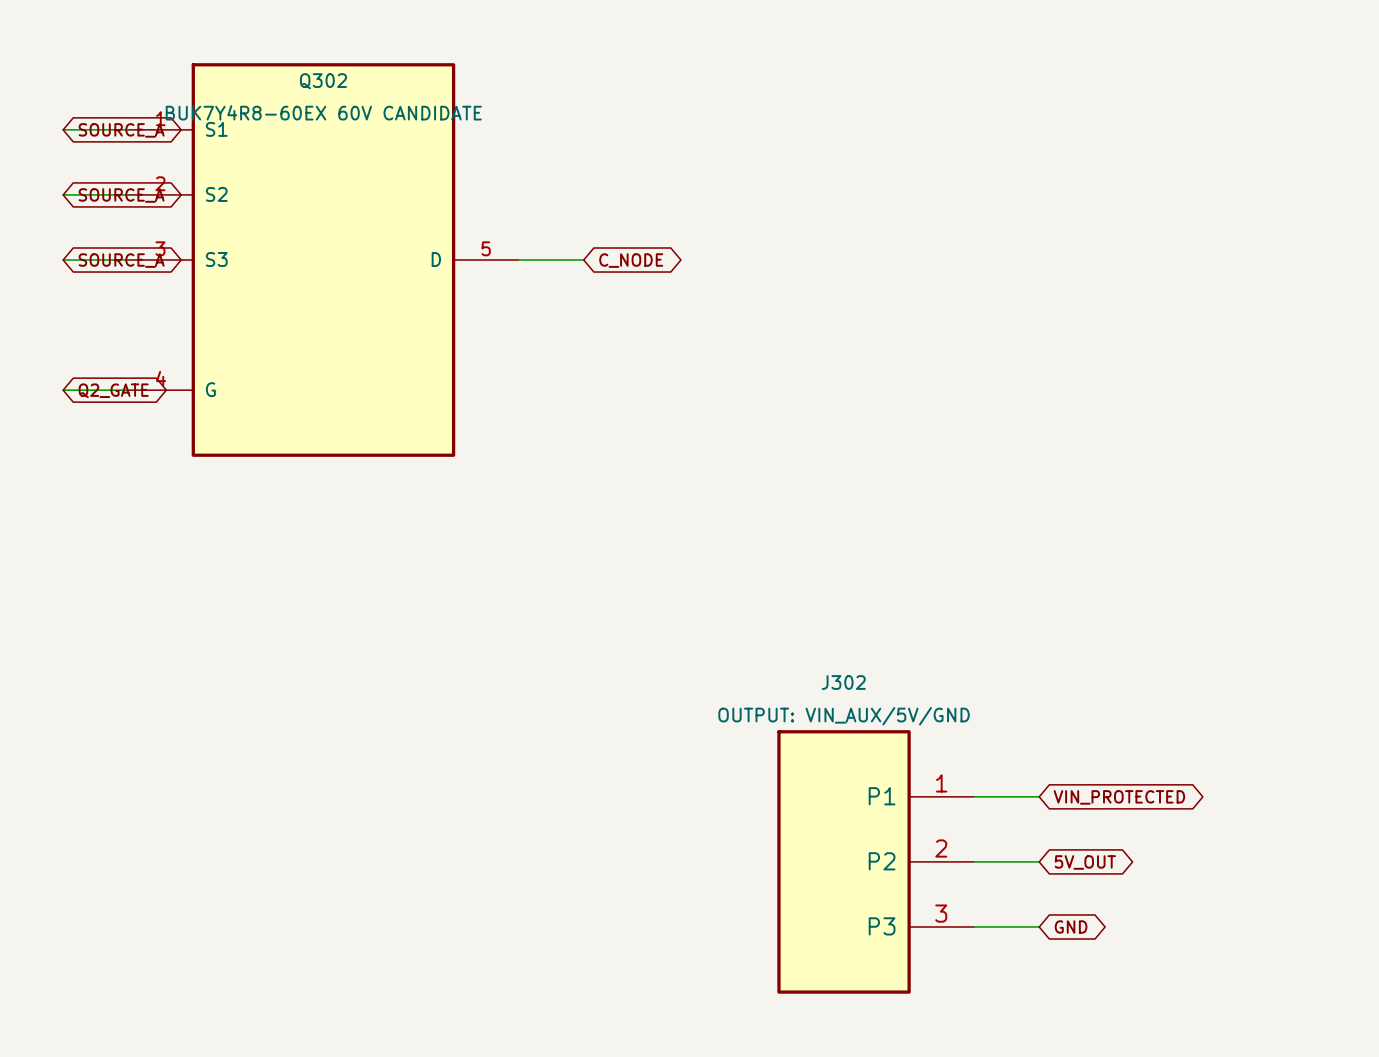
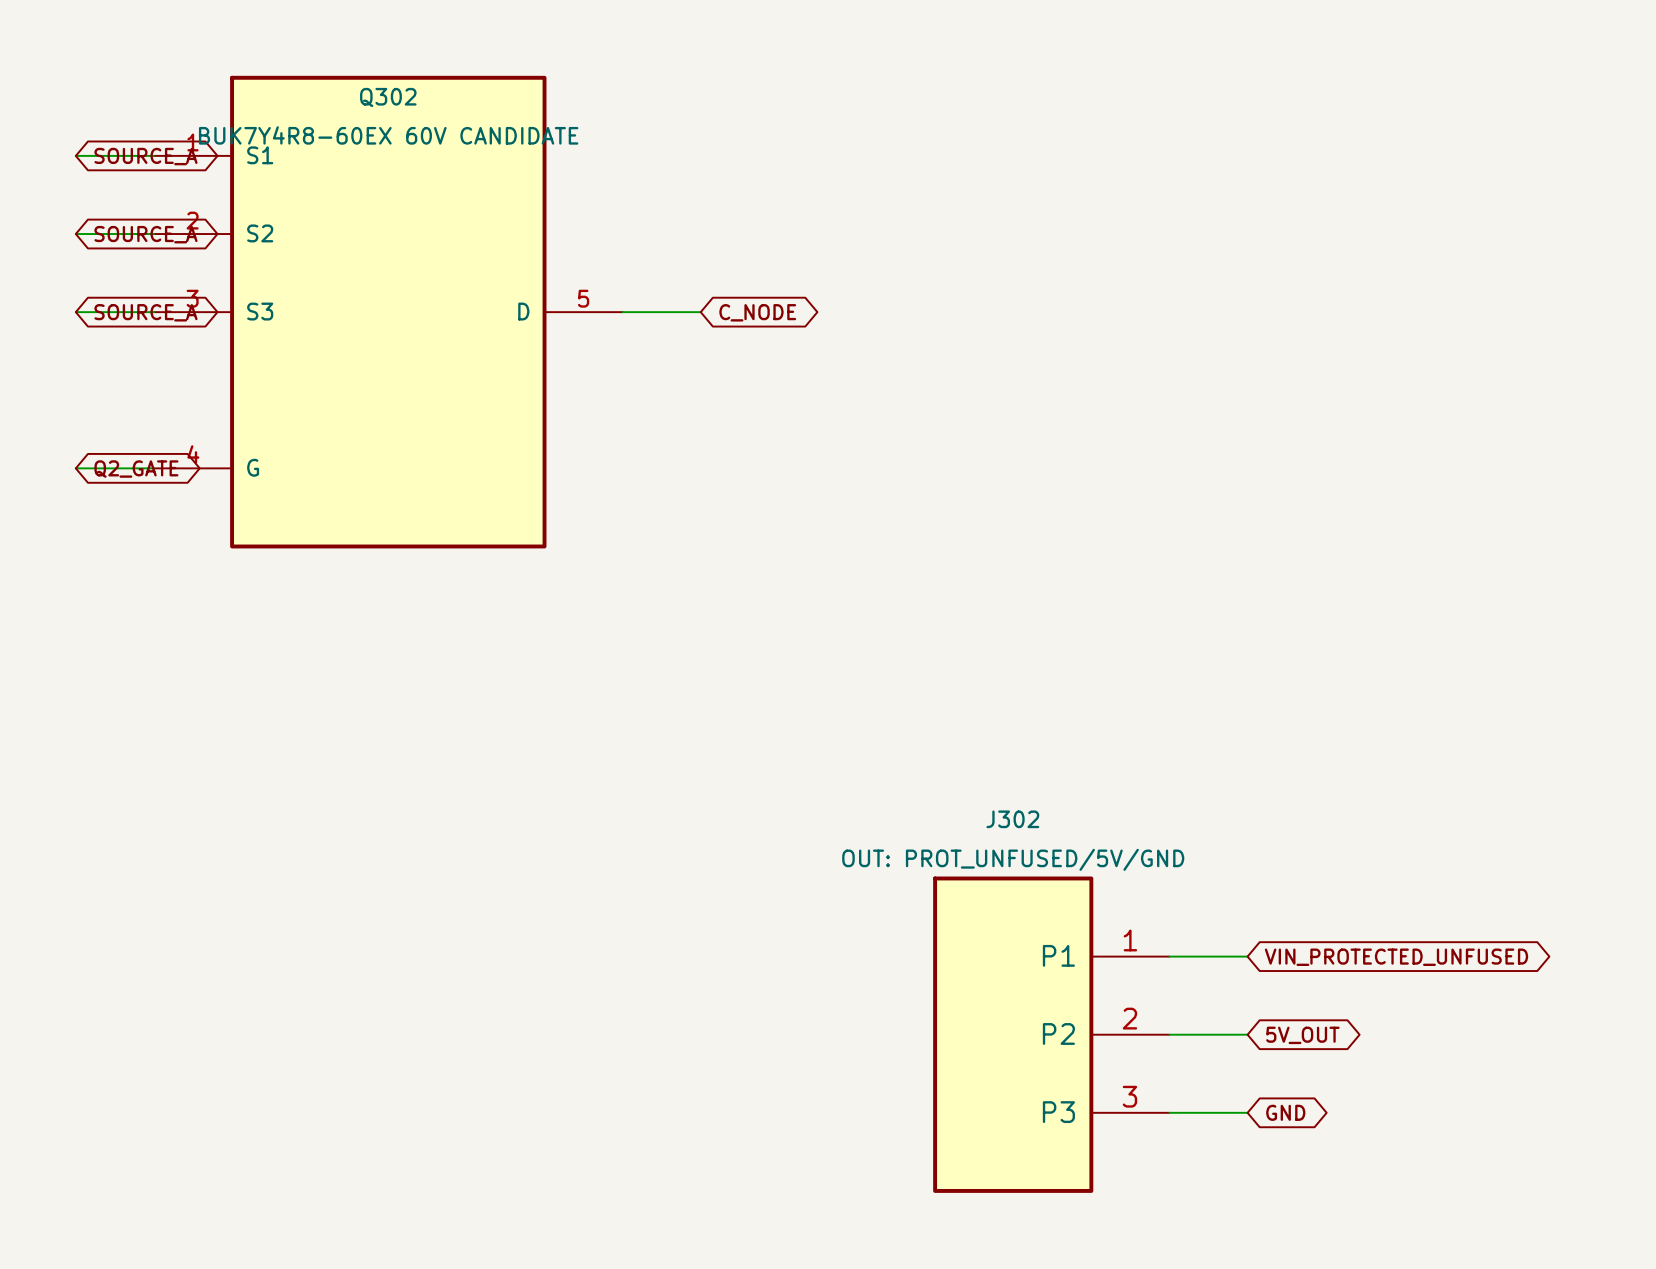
J302 value: OUTPUT: VIN_AUX/5V/GND (844, 716) -> OUT: PROT_UNFUSED/5V/GND (1013, 859)
global label: VIN_PROTECTED (1119, 797) -> VIN_PROTECTED_UNFUSED (1396, 957)

